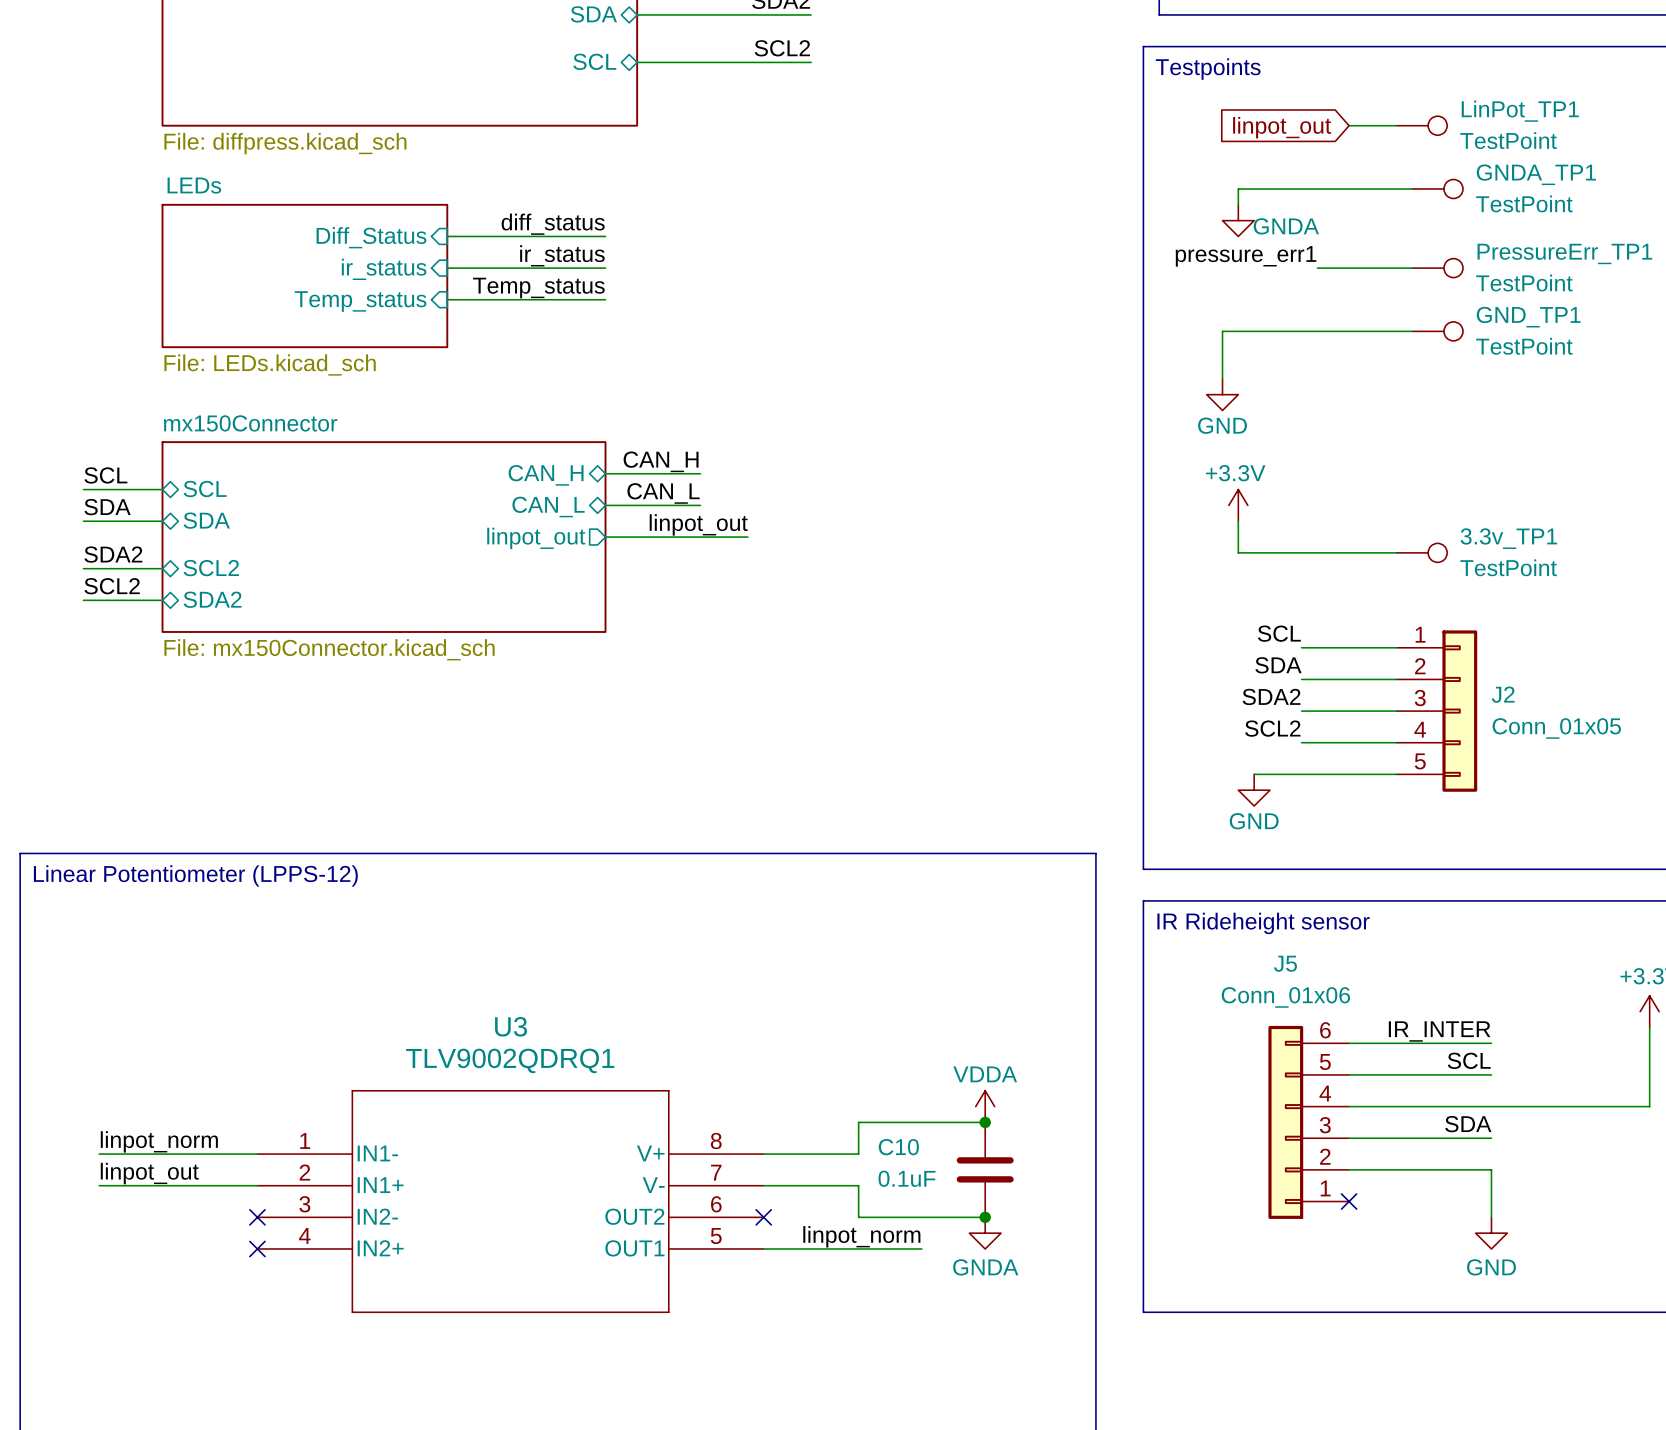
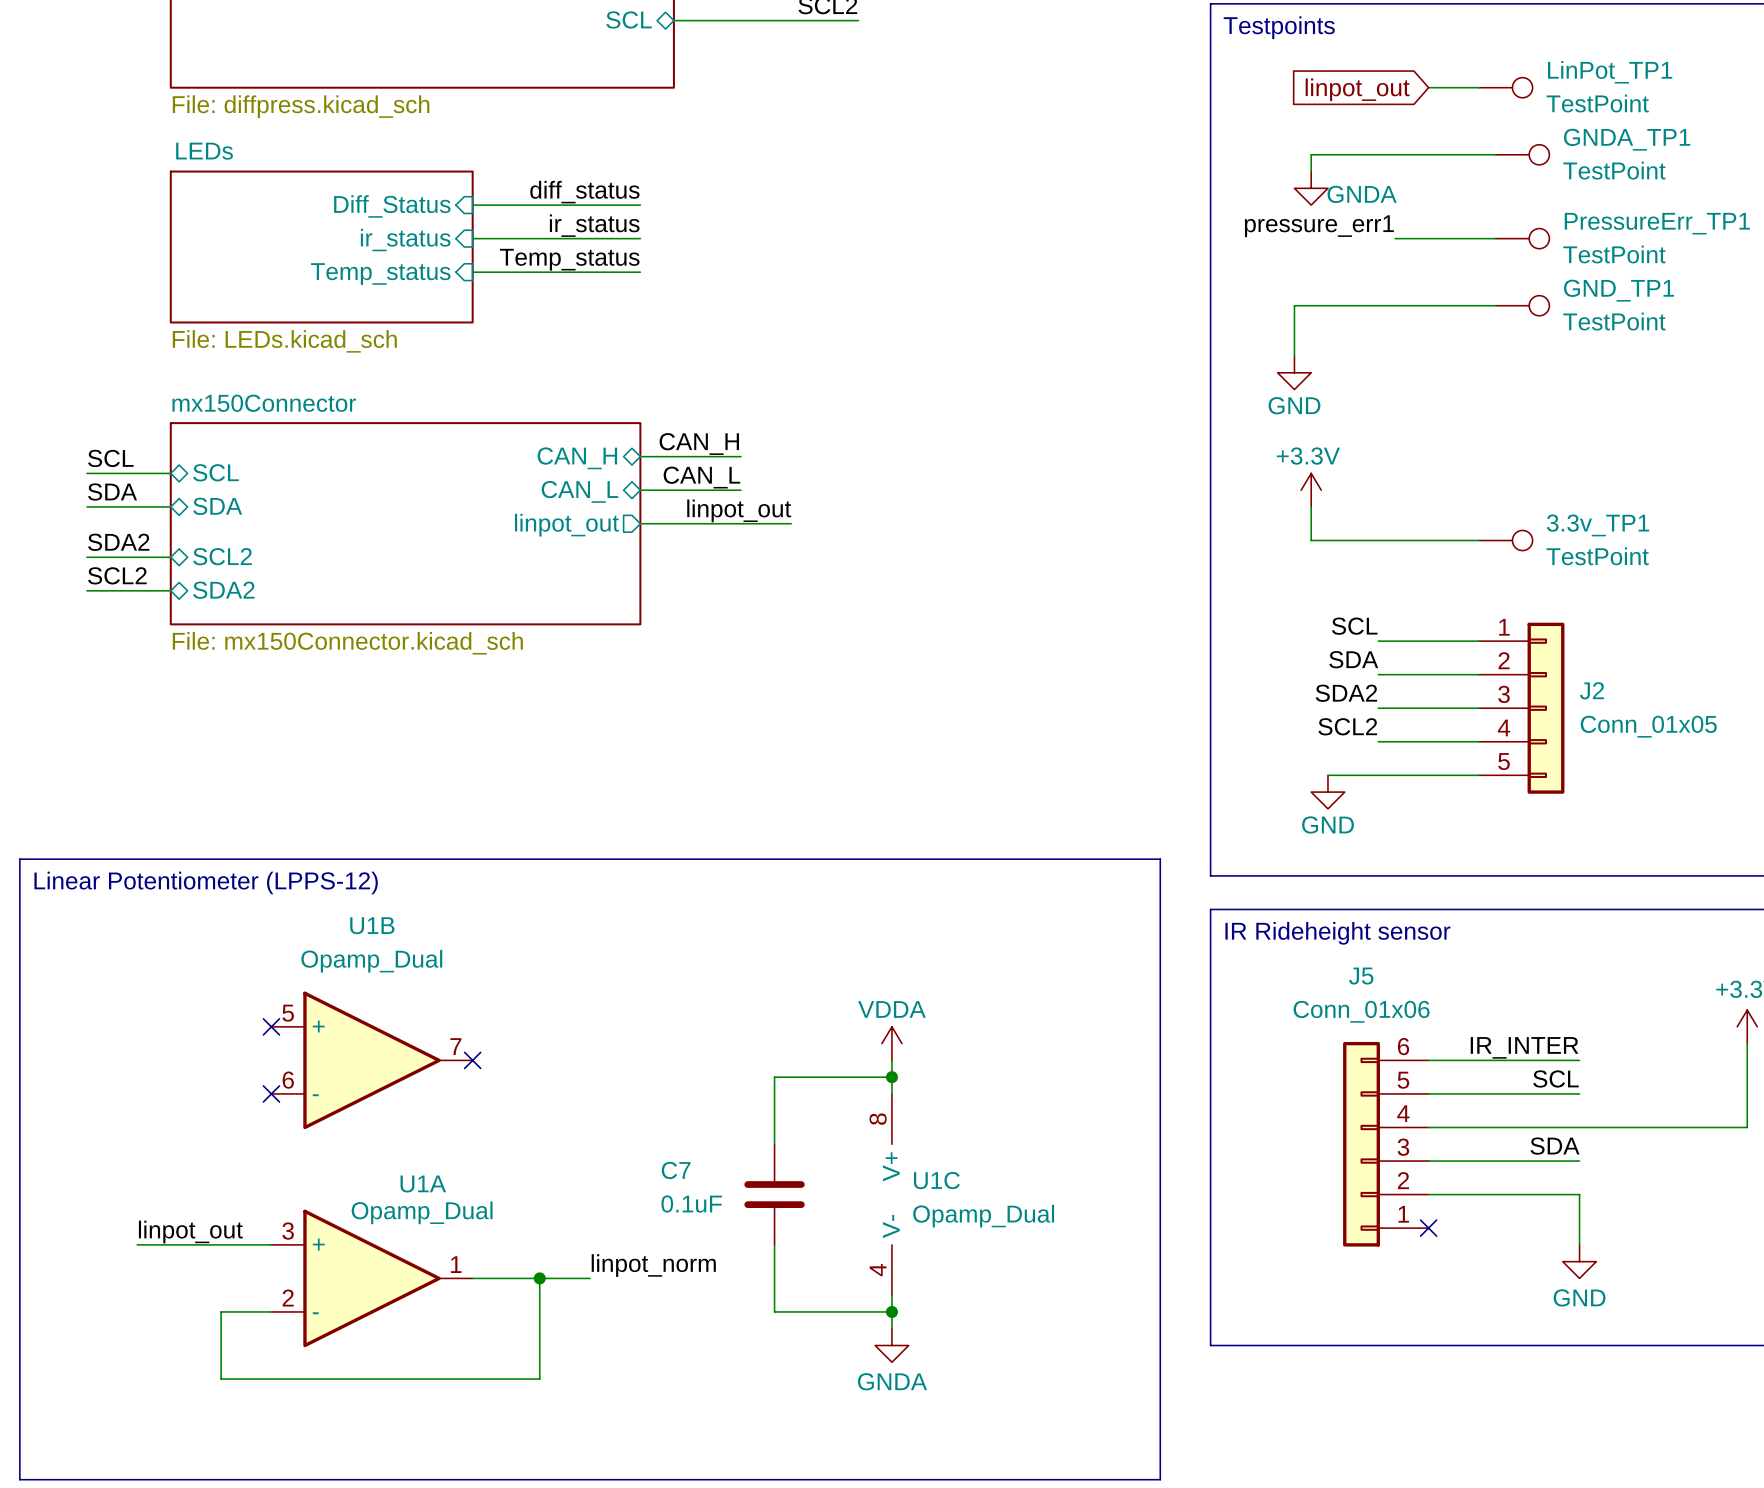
no-connect mark: none -> (271, 1026)
U1B: none -> Opamp_Dual (372, 1060)
no-connect mark: none -> (472, 1060)
wire: none -> (891, 1060) (891, 1093)
wire: none -> (891, 1077) (774, 1077) (774, 1144)
junction: none -> (891, 1077)
no-connect mark: none -> (271, 1093)
power symbol position: VDDA (985, 1106) -> VDDA (891, 1043)
wire: (985, 1122) (858, 1122) (858, 1154) (763, 1154) -> none
junction: (985, 1122) -> none
label: linpot_norm (159, 1141) -> none
wire: (99, 1154) (257, 1154) -> none
C7: none -> 0.1uF (774, 1194)
U1C: none -> Opamp_Dual (891, 1194)
C10: 0.1uF (985, 1169) -> none
label position: linpot_out (149, 1173) -> linpot_out (190, 1232)
wire: (99, 1185) (257, 1185) -> none
wire: (763, 1185) (858, 1185) (858, 1217) (985, 1217) -> none
U3: TLV9002QDRQ1 (510, 1201) -> none
wire: none -> (137, 1244) (271, 1244)
no-connect mark: (257, 1217) -> none
wire: none -> (774, 1244) (774, 1311) (891, 1311)
no-connect mark: (763, 1217) -> none
junction: (985, 1217) -> none
power symbol position: GNDA (985, 1233) -> GNDA (891, 1345)
label: none -> linpot_norm (653, 1265)
label: linpot_norm (861, 1236) -> none
no-connect mark: (257, 1248) -> none
U1A: none -> Opamp_Dual (372, 1278)
wire: none -> (472, 1278) (590, 1278)
wire: none -> (539, 1278) (539, 1379) (221, 1379) (221, 1311) (271, 1311)
junction: none -> (539, 1278)
wire: (763, 1248) (921, 1248) -> none
wire: none -> (891, 1295) (891, 1328)
junction: none -> (891, 1311)

